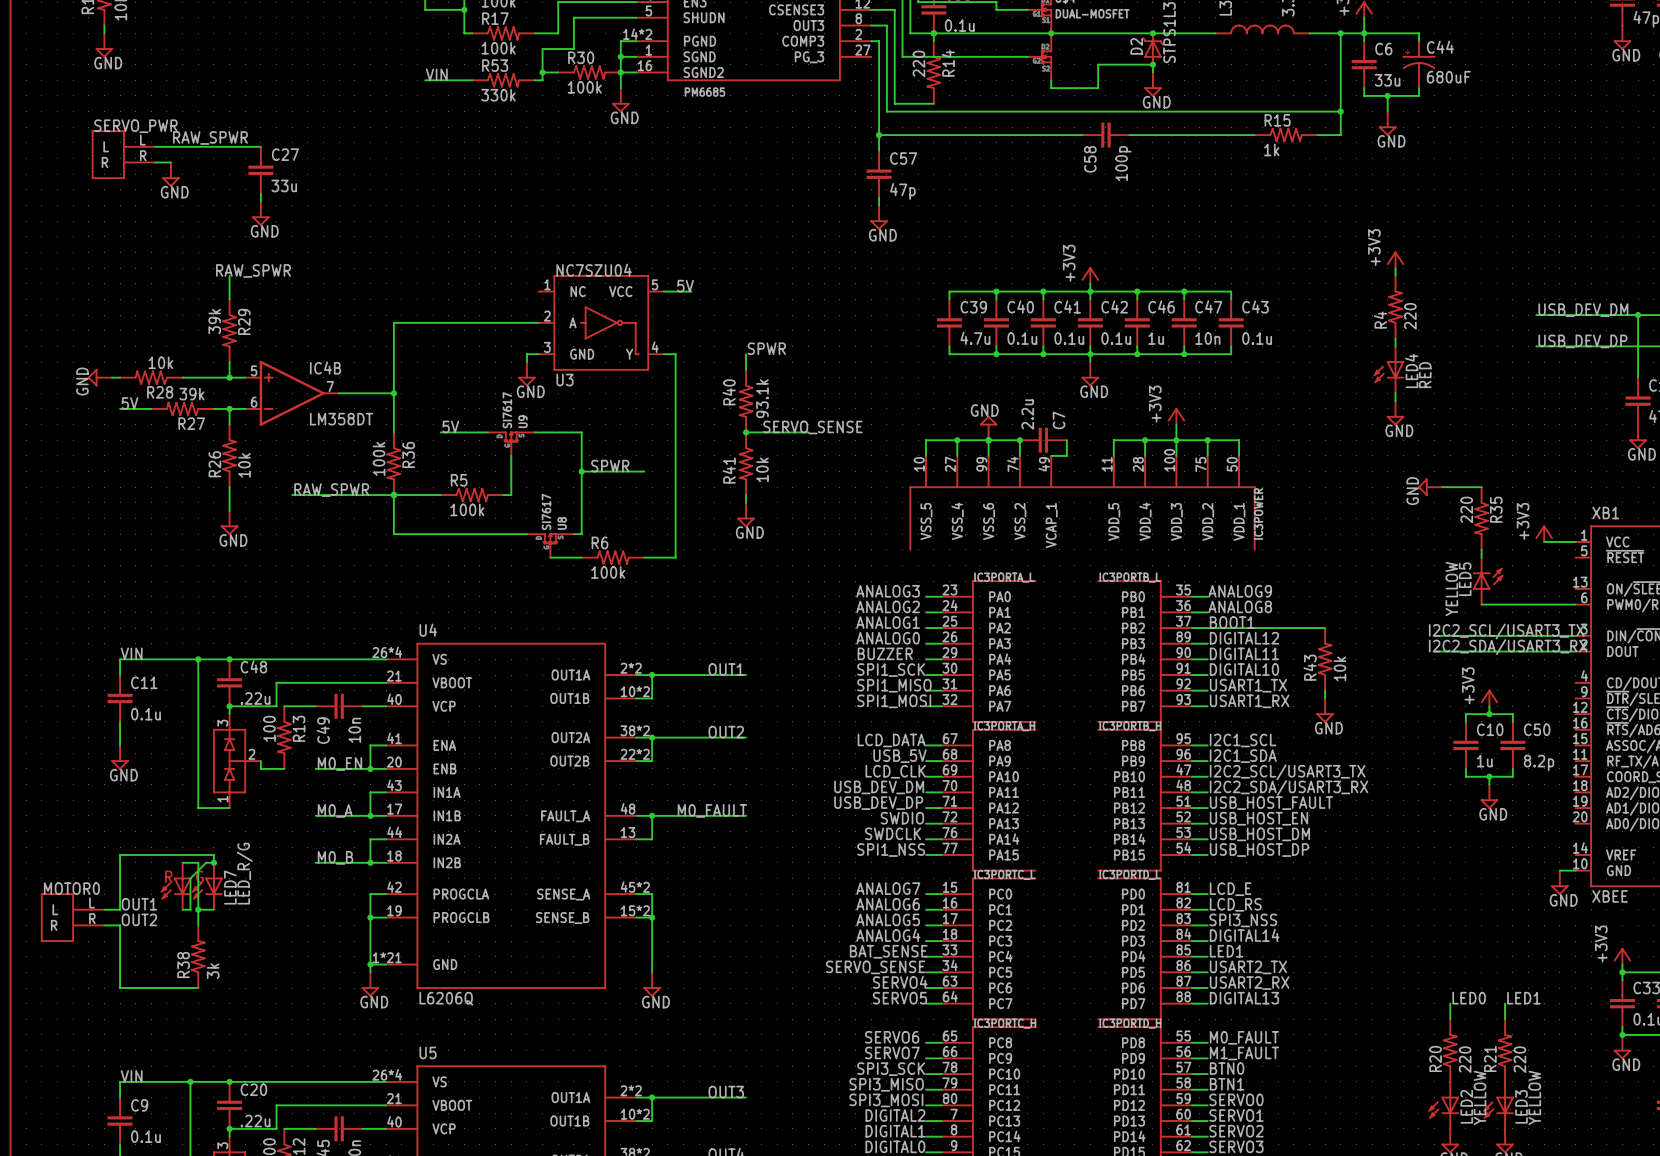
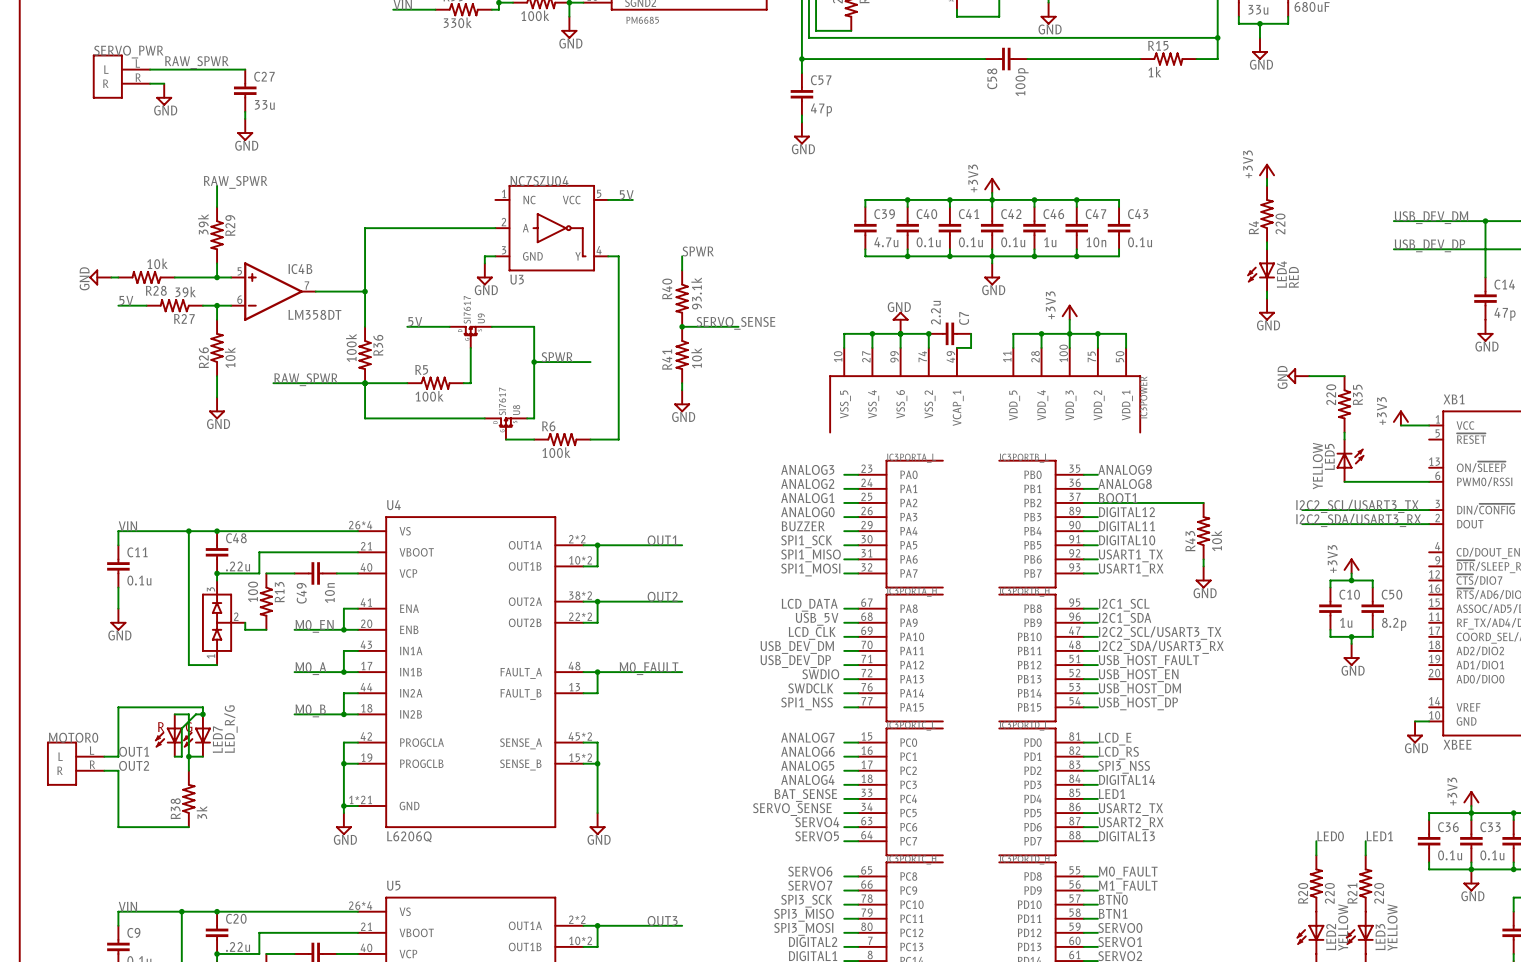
wire: none -> (1471, 813) (1429, 813) (1429, 820)
C36: none -> 0.1u (1429, 841)
wire: none -> (1429, 862) (1429, 869) (1471, 869)

